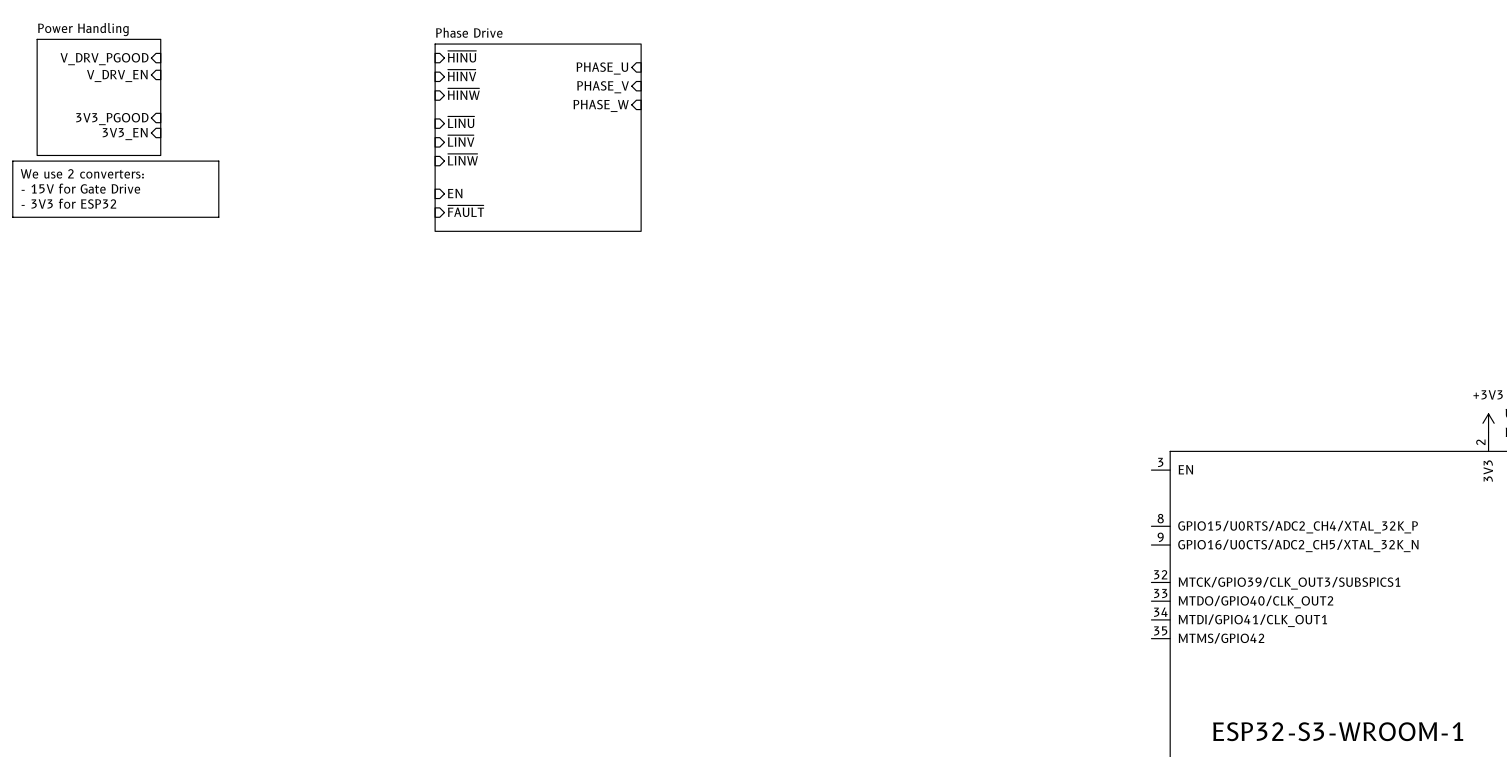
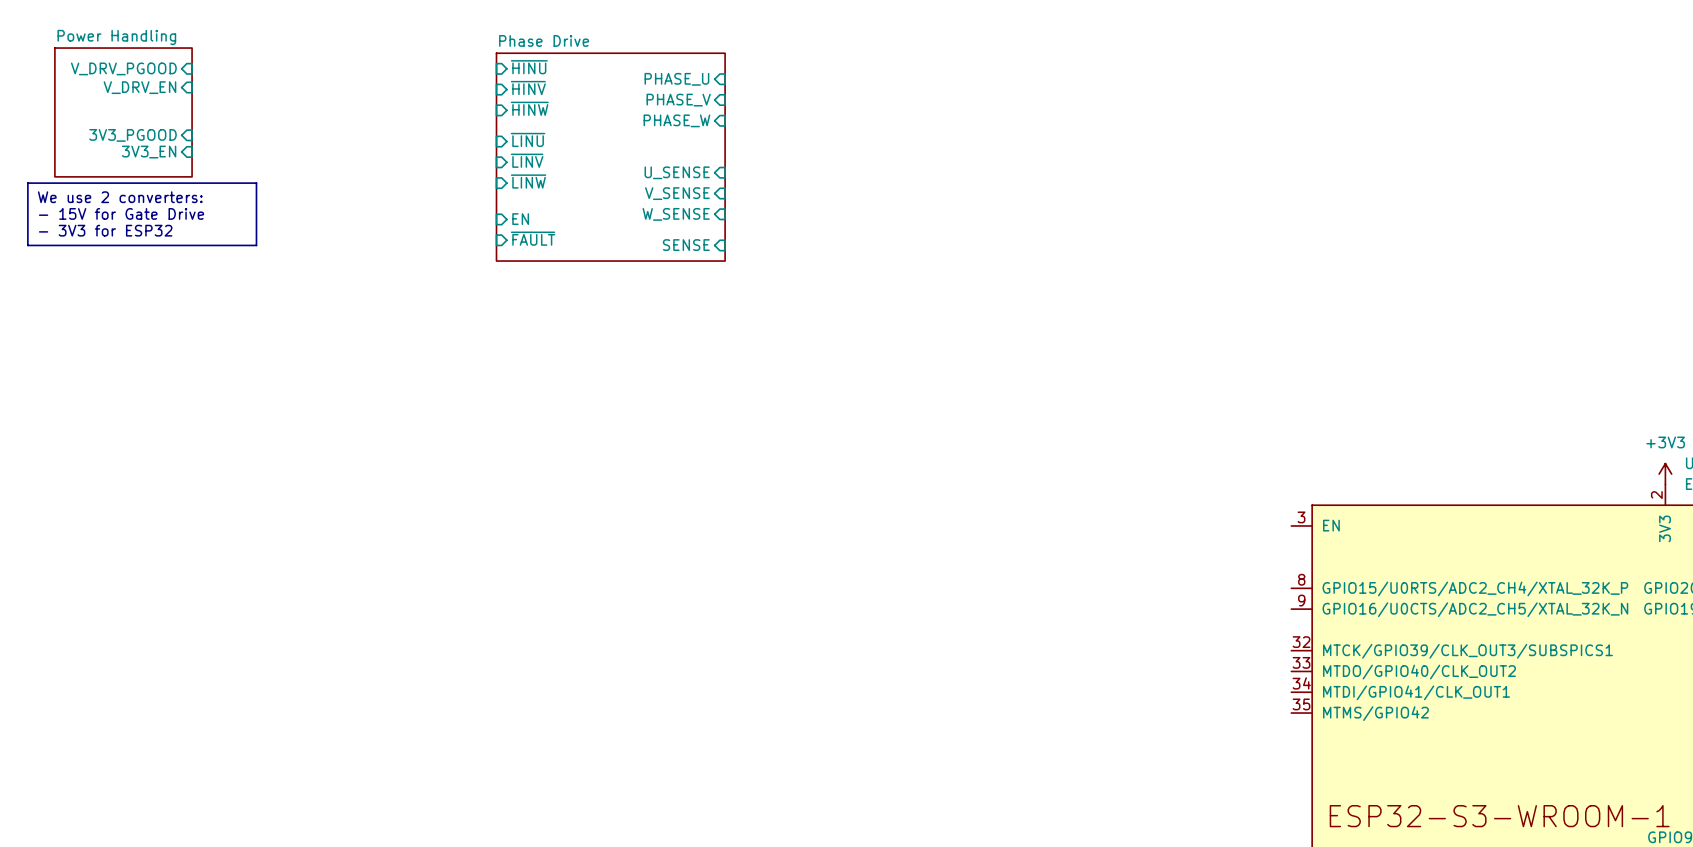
sheet pin: none -> U_SENSE (677, 172)
sheet pin: none -> V_SENSE (677, 193)
sheet pin: none -> W_SENSE (676, 214)
sheet pin: none -> SENSE (686, 245)

